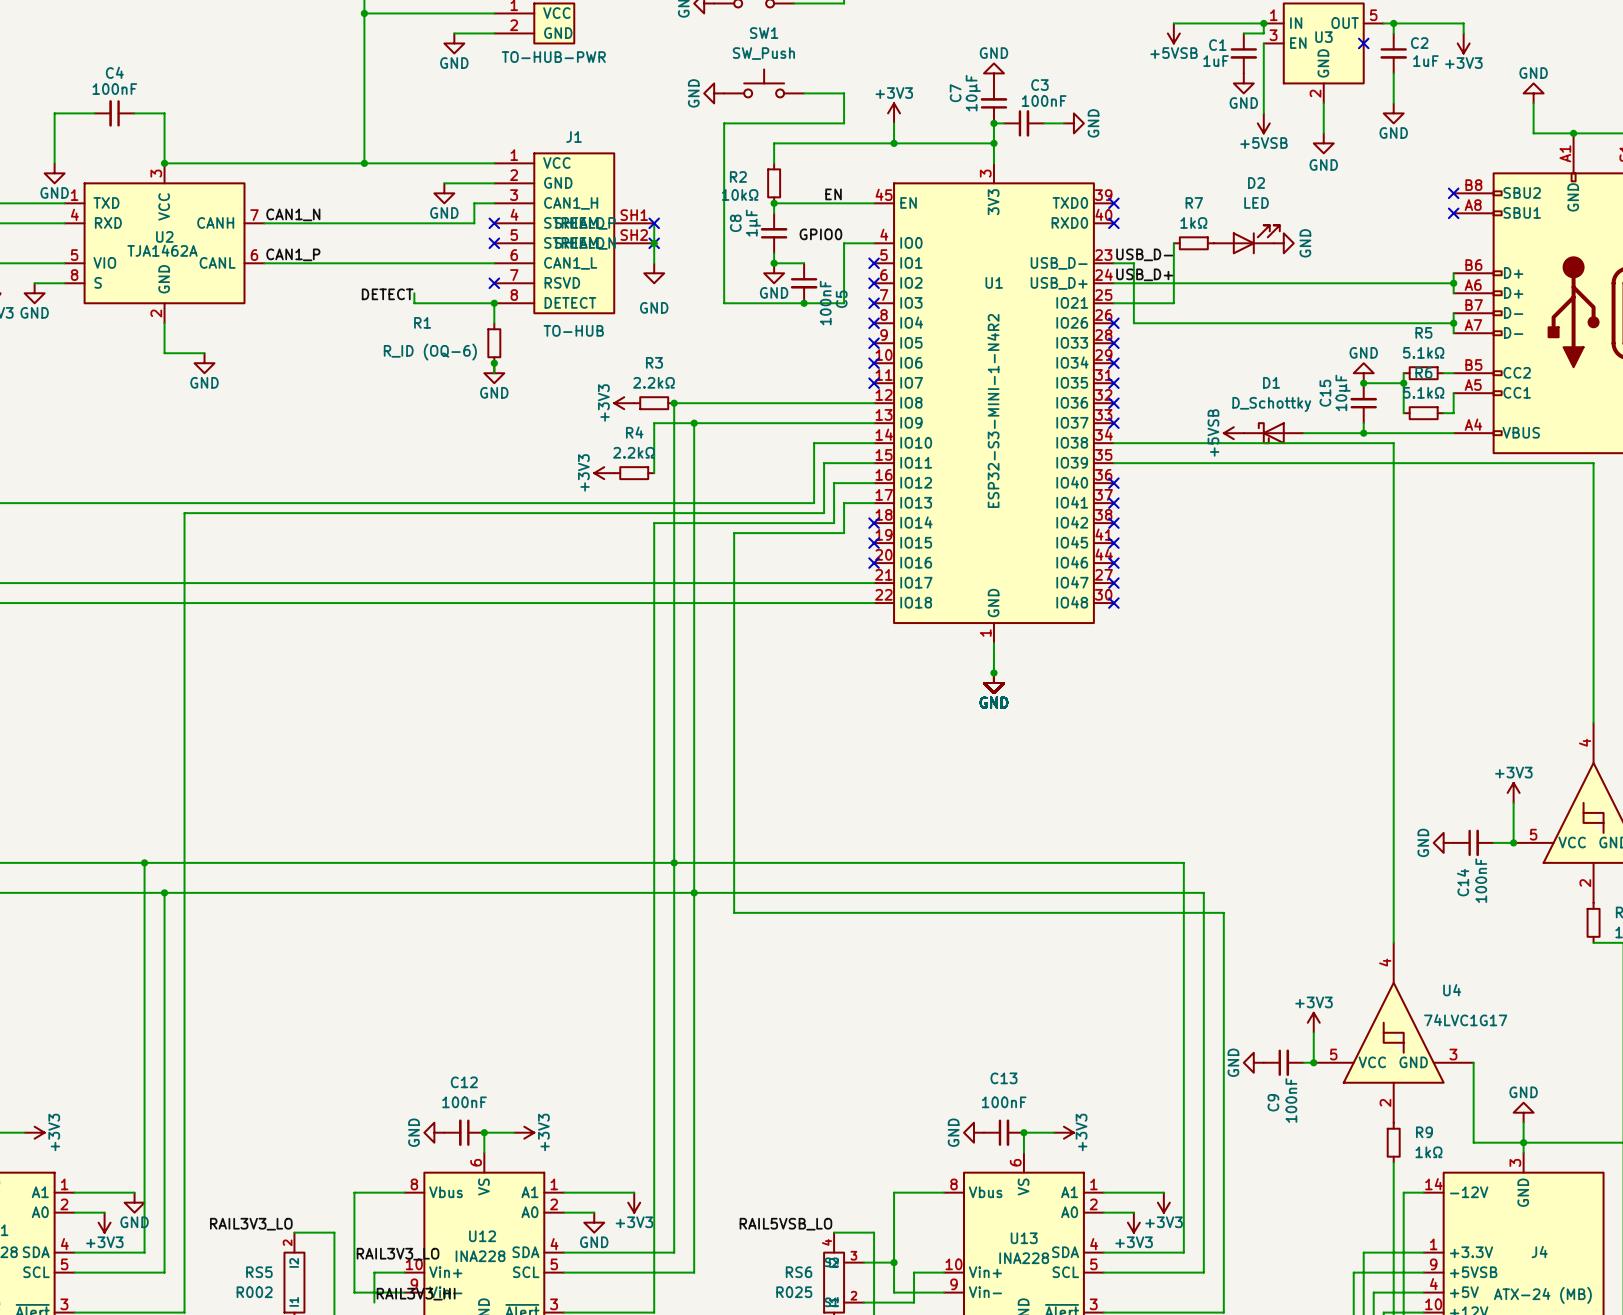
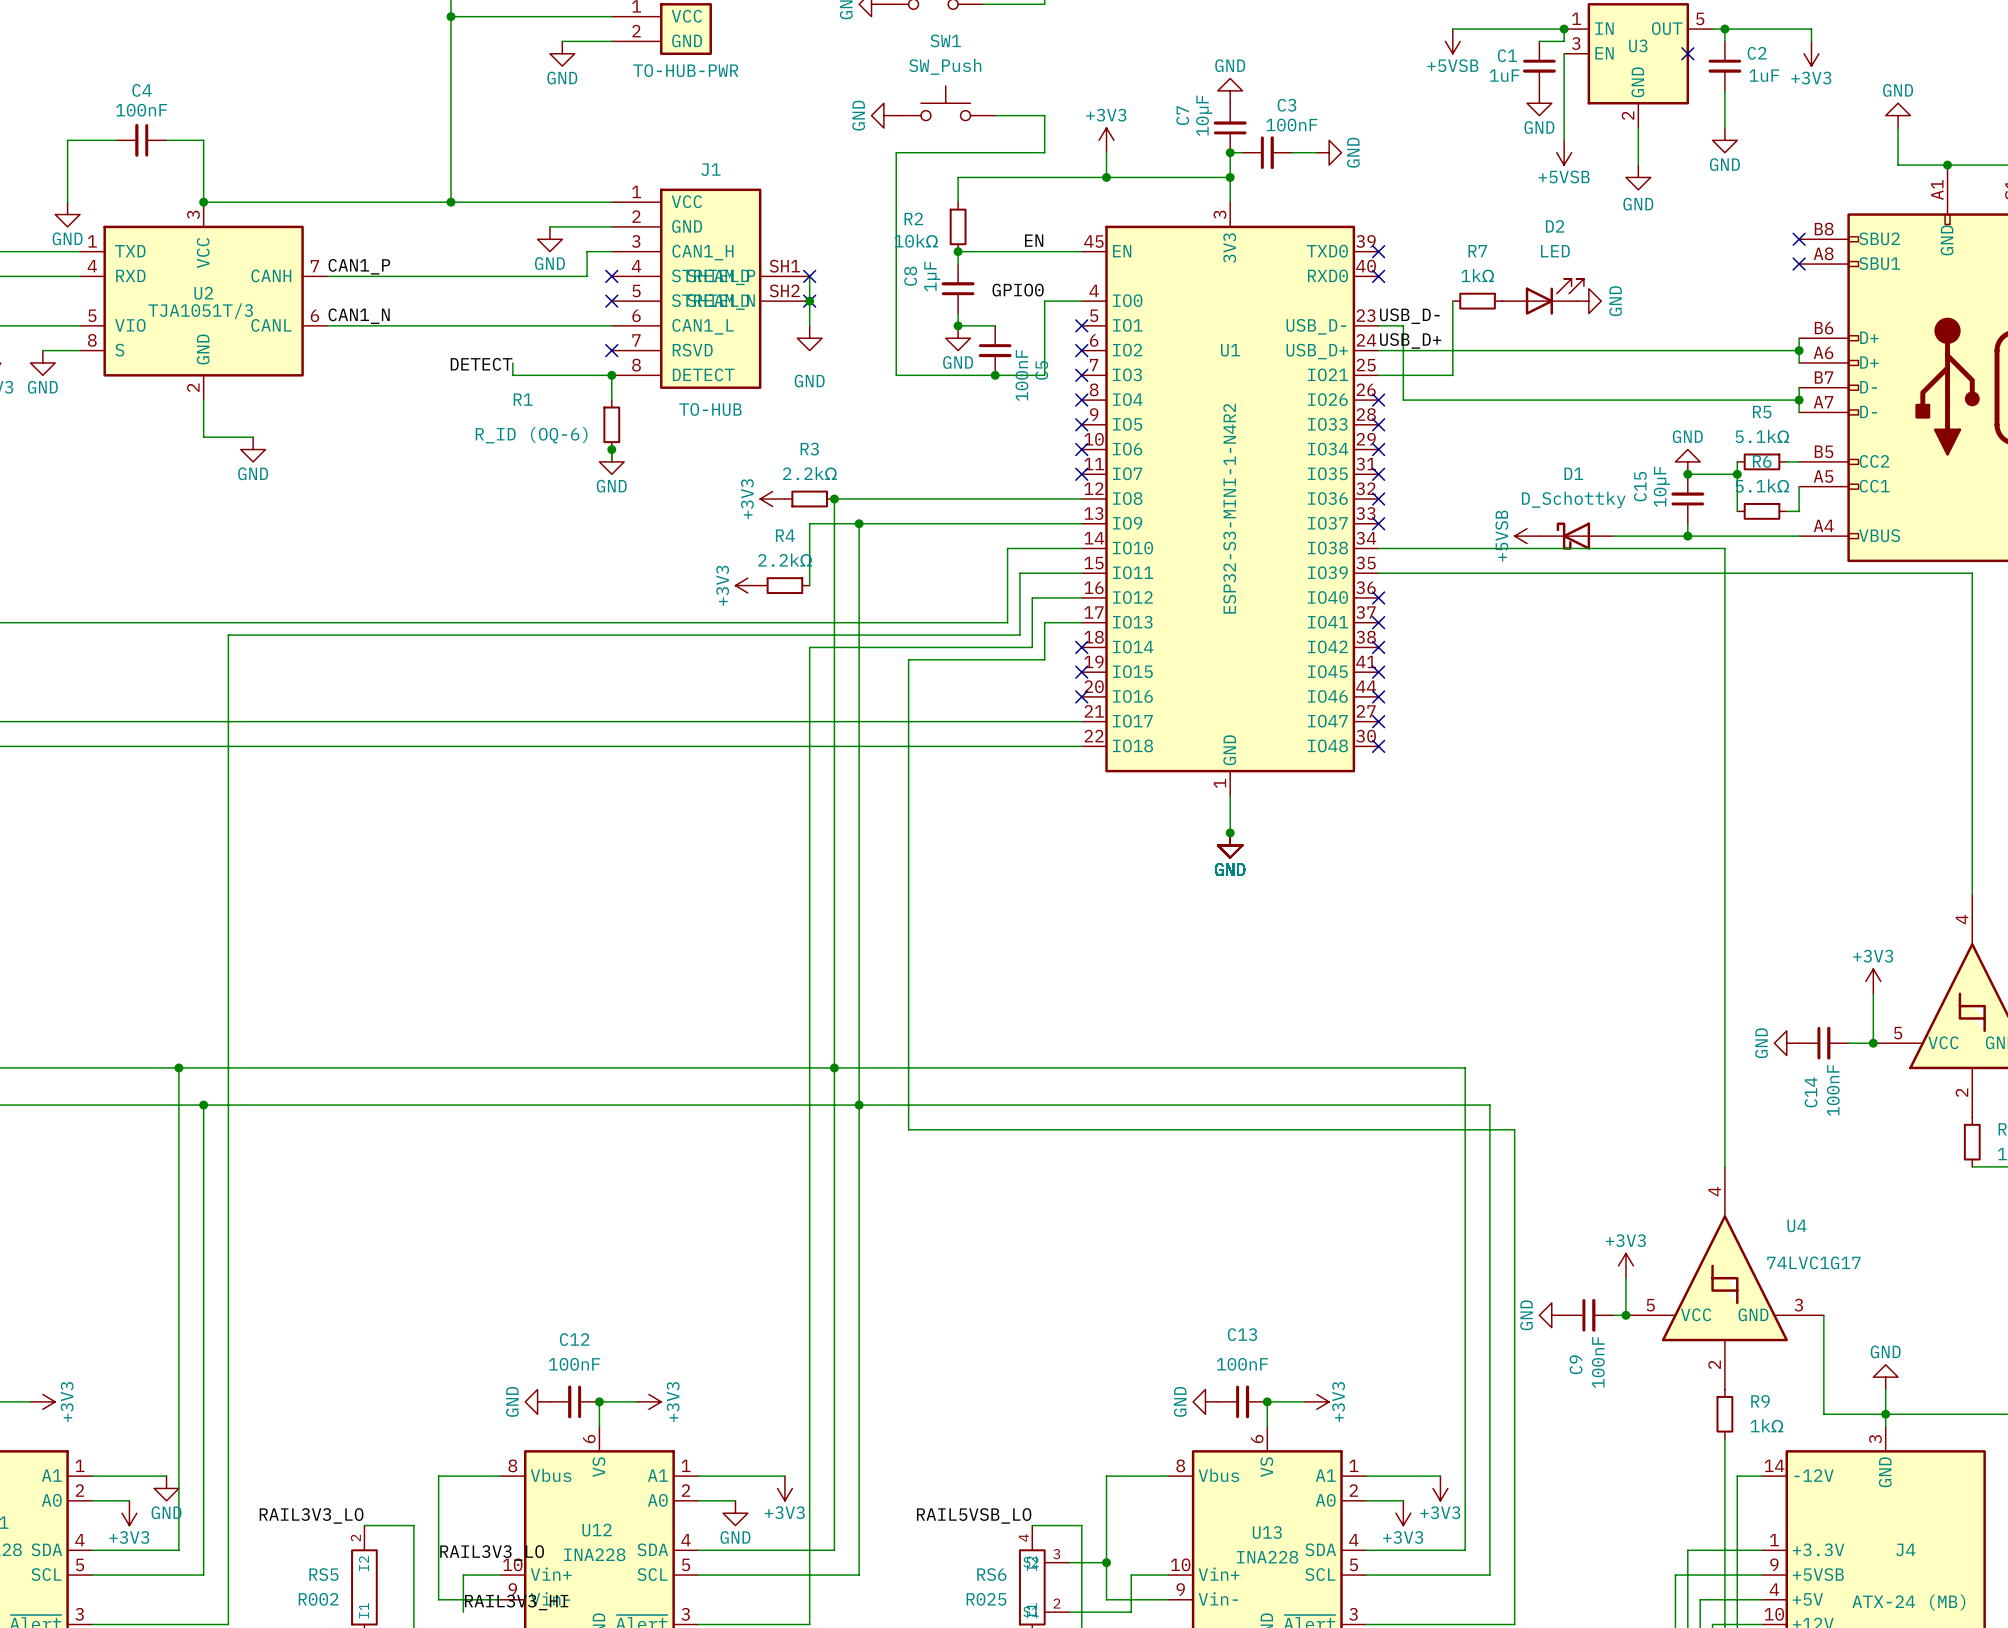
label: CAN1_N (293, 214) -> CAN1_P (359, 266)
U2 value: TJA1462A (162, 250) -> TJA1051T/3 (200, 311)
label: CAN1_P (293, 254) -> CAN1_N (359, 316)

